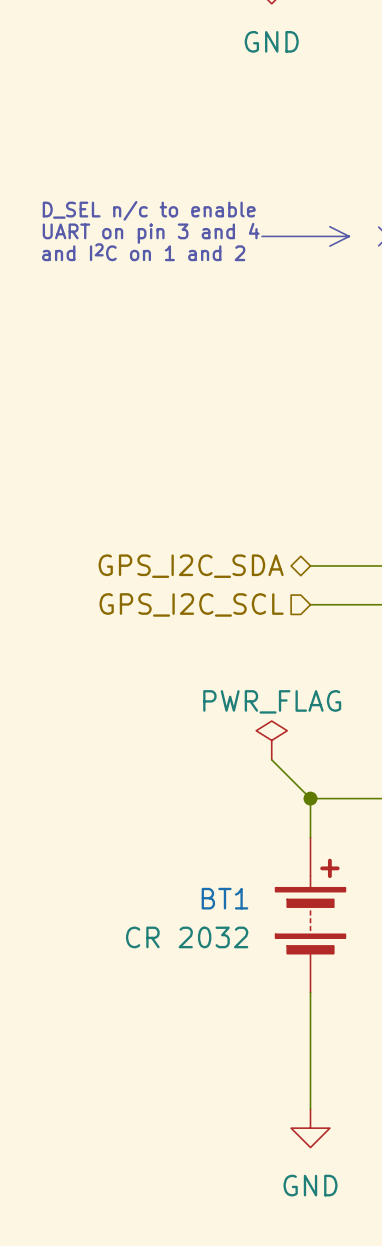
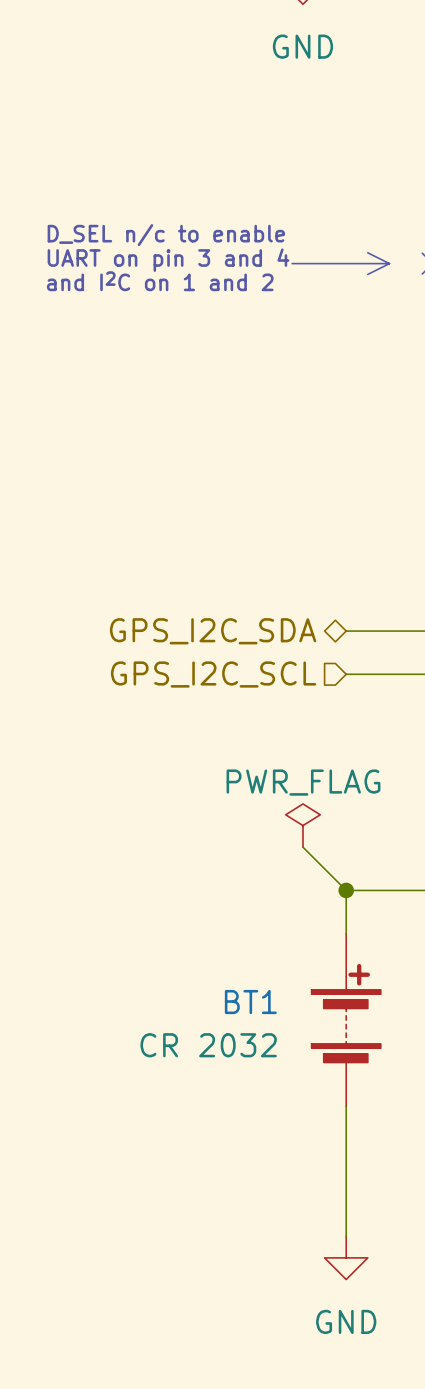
BT1 symbol: [275, 837, 346, 993] -> [311, 933, 381, 1107]

